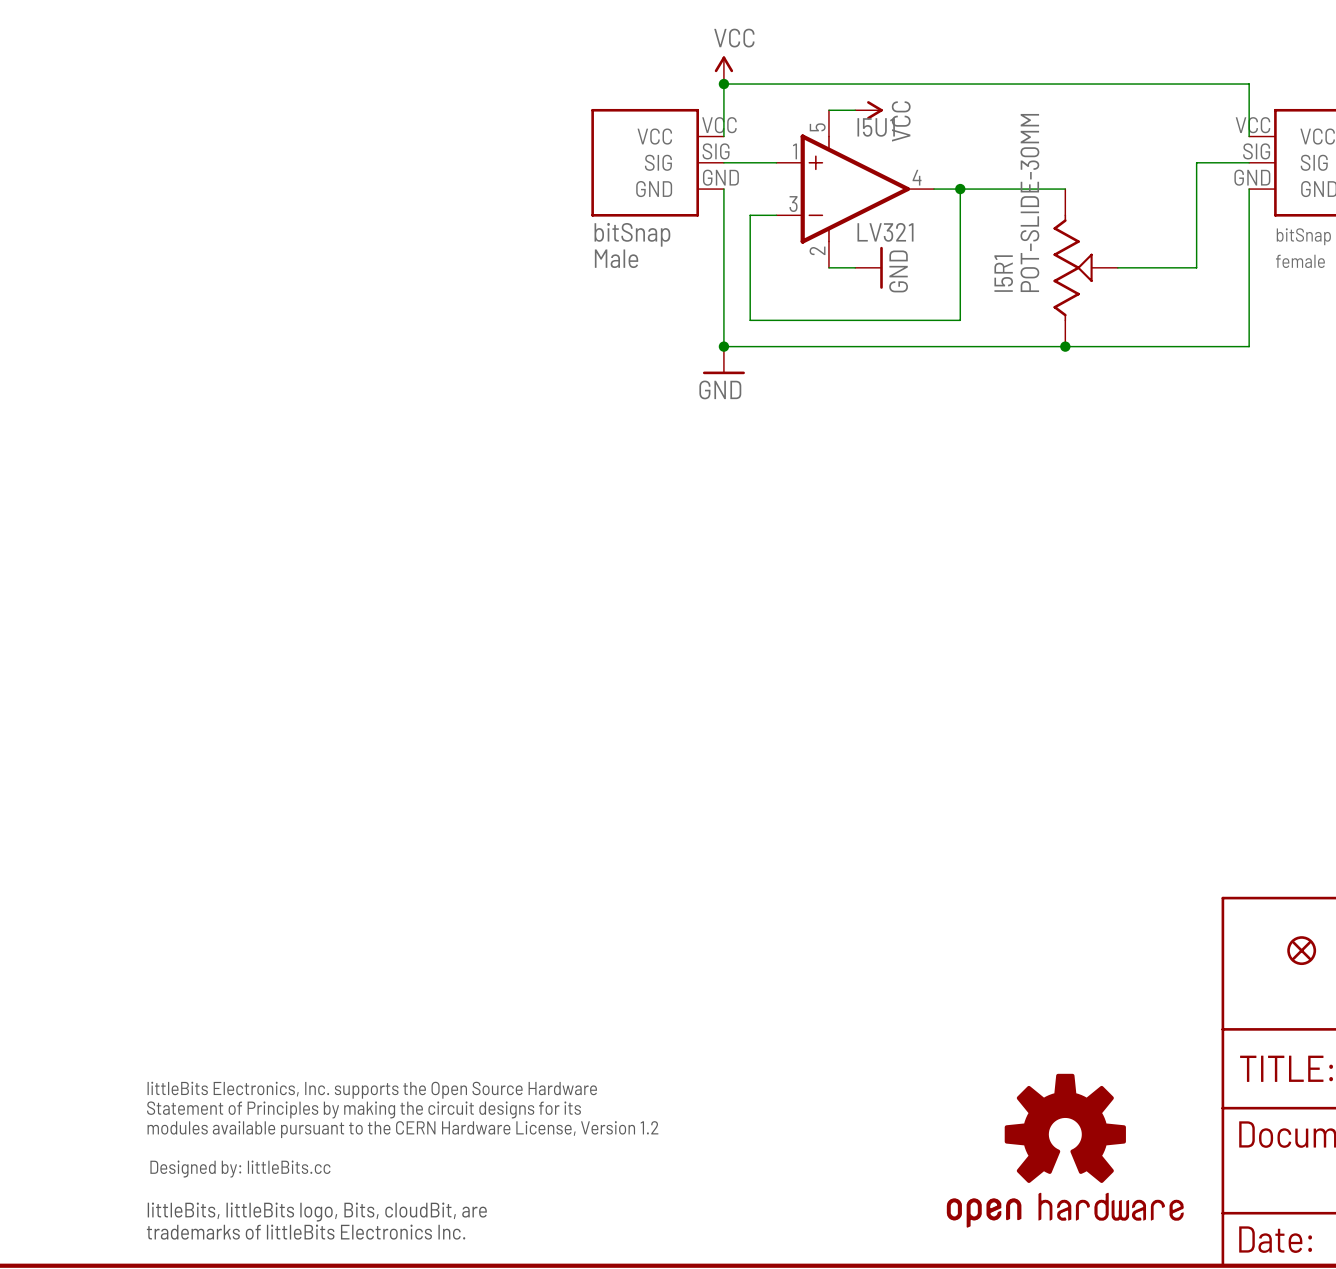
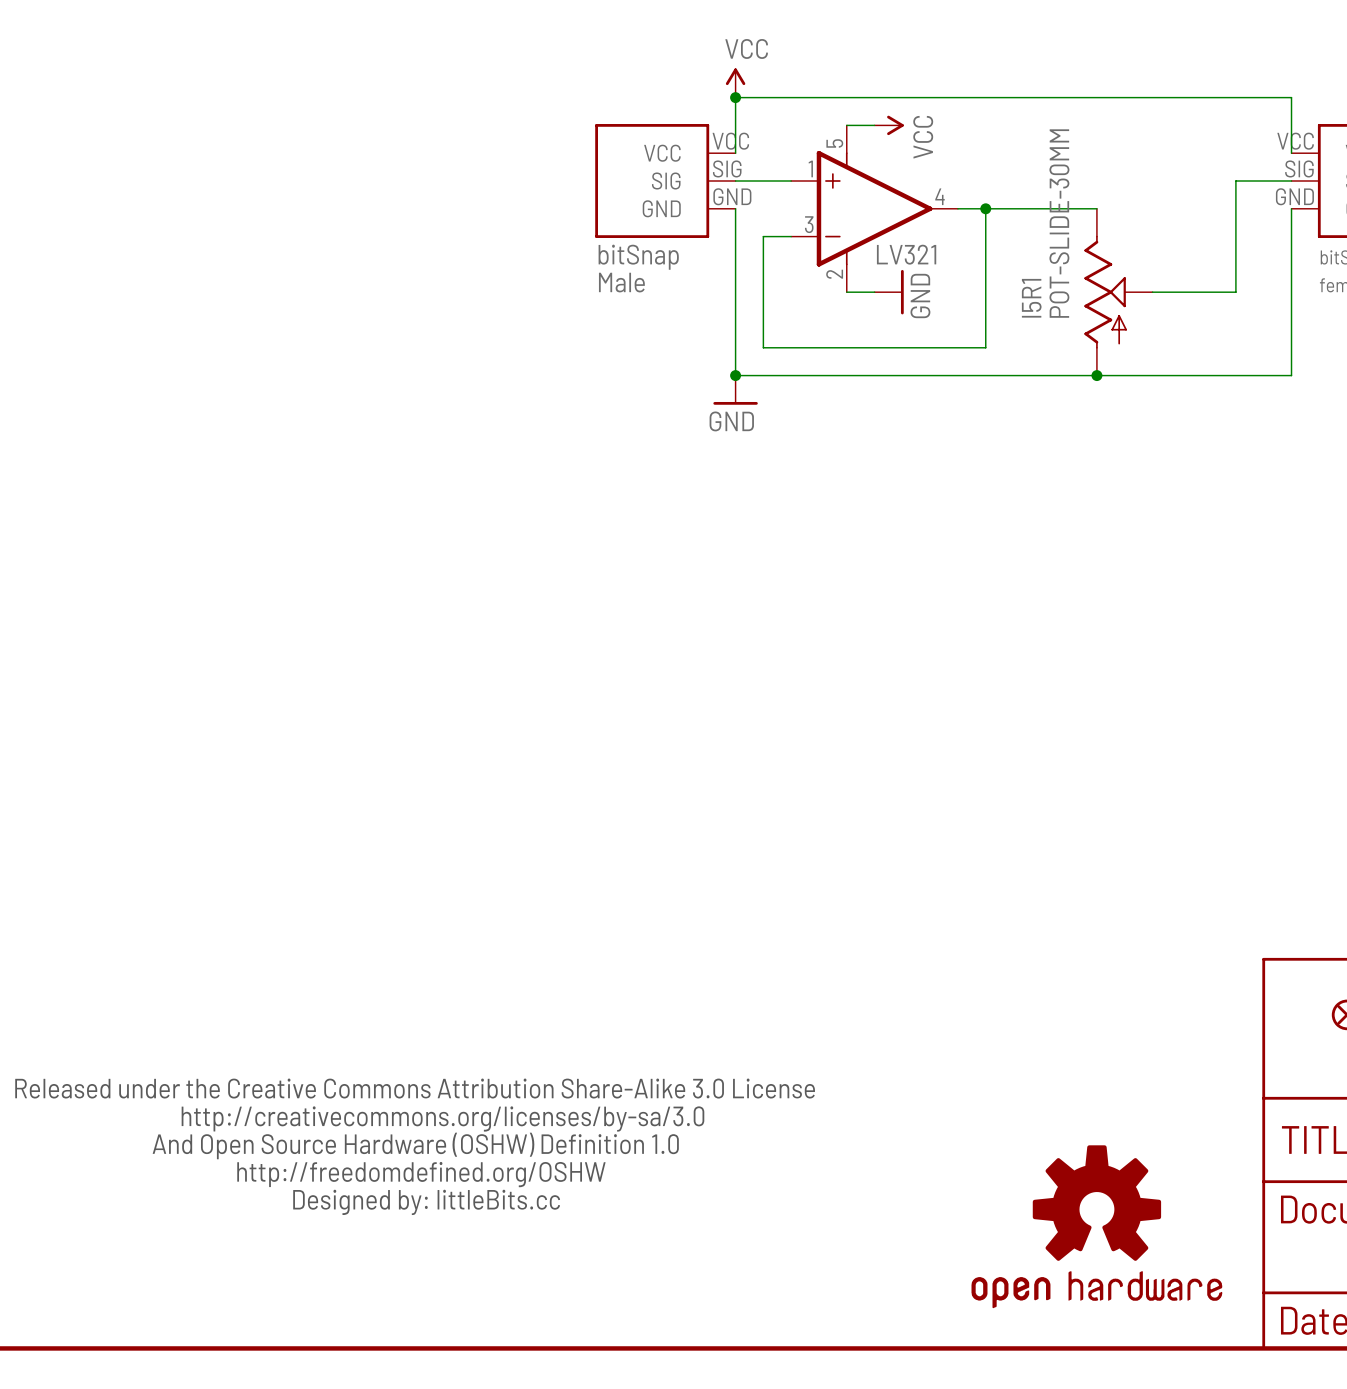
I5U1 name: I5U1 (876, 127) -> none
I5R1 symbol: [1053, 189, 1118, 347] -> [1084, 208, 1153, 376]
part: none -> (415, 1146)
part: (402, 1160) -> none

